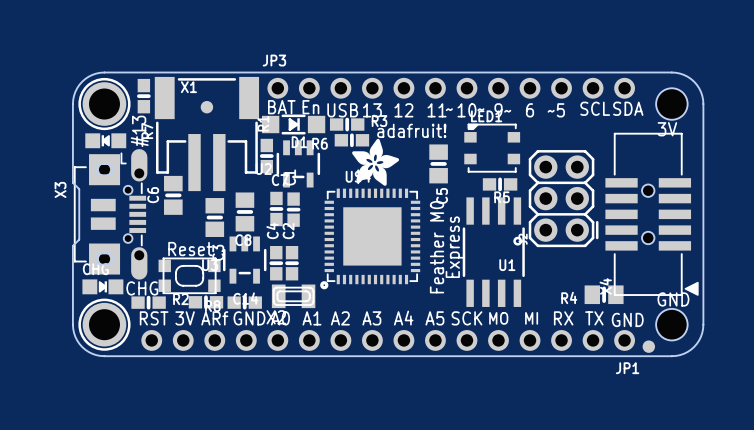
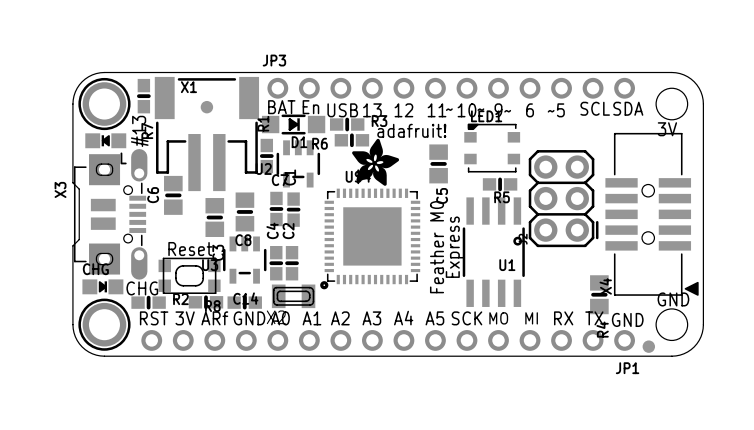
R4 rotation: 0° (604, 294) -> 90° clockwise (599, 294)
R4 name position: R4 (569, 297) -> R4 (602, 329)

